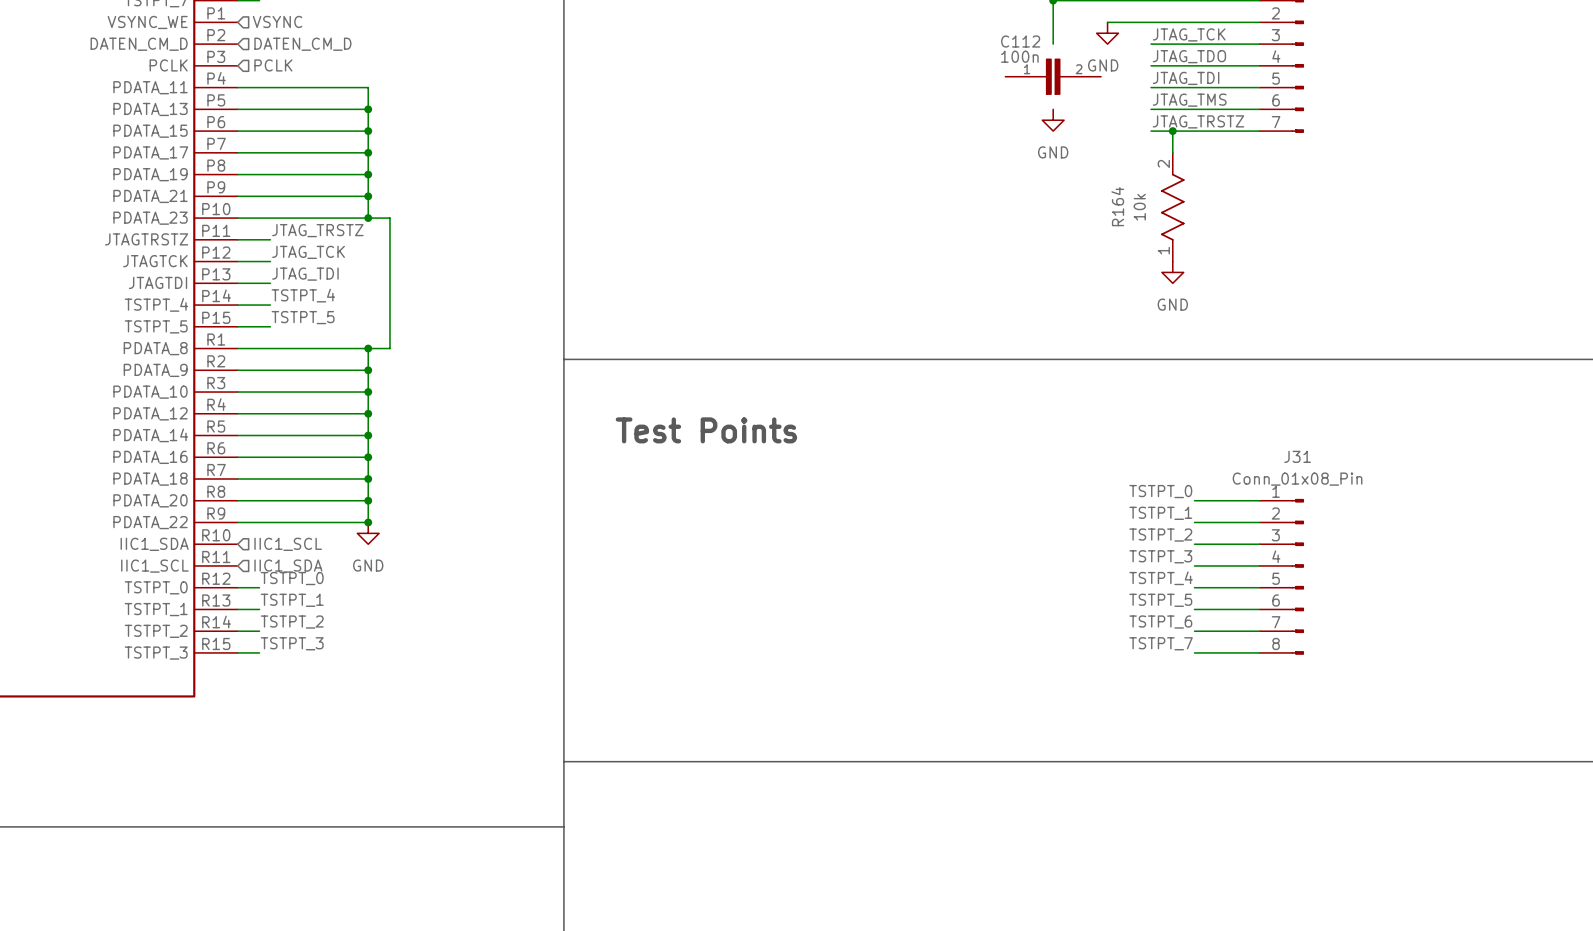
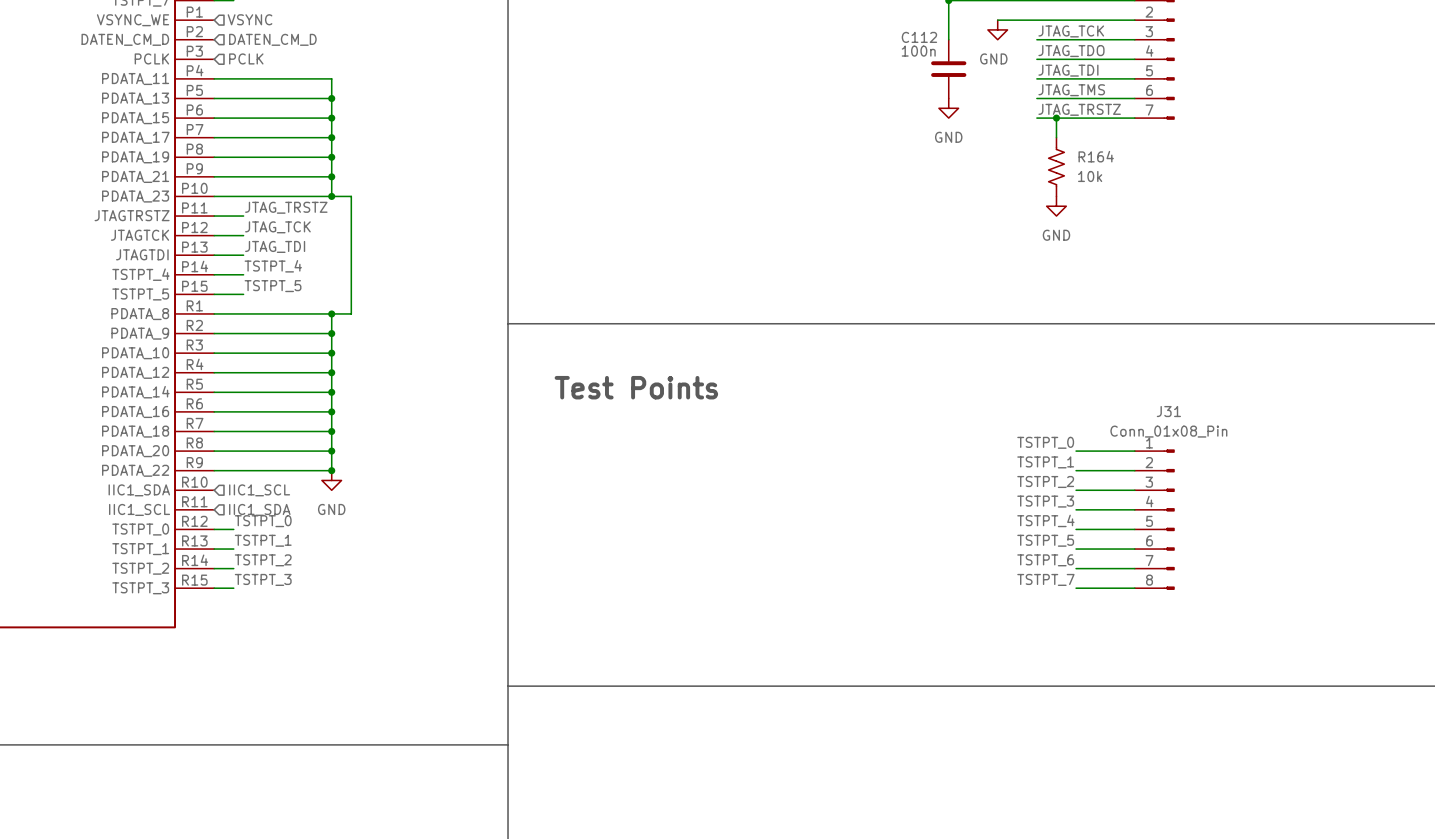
C112 symbol: [1005, 58, 1102, 95] -> [931, 39, 967, 99]
R164 symbol: [1161, 152, 1185, 262] -> [1048, 137, 1065, 197]
R164 name position: R164 (1117, 206) -> R164 (1096, 156)
R164 value position: 10k (1139, 207) -> 10k (1090, 176)
power symbol position: GND (1172, 272) -> GND (1056, 206)

